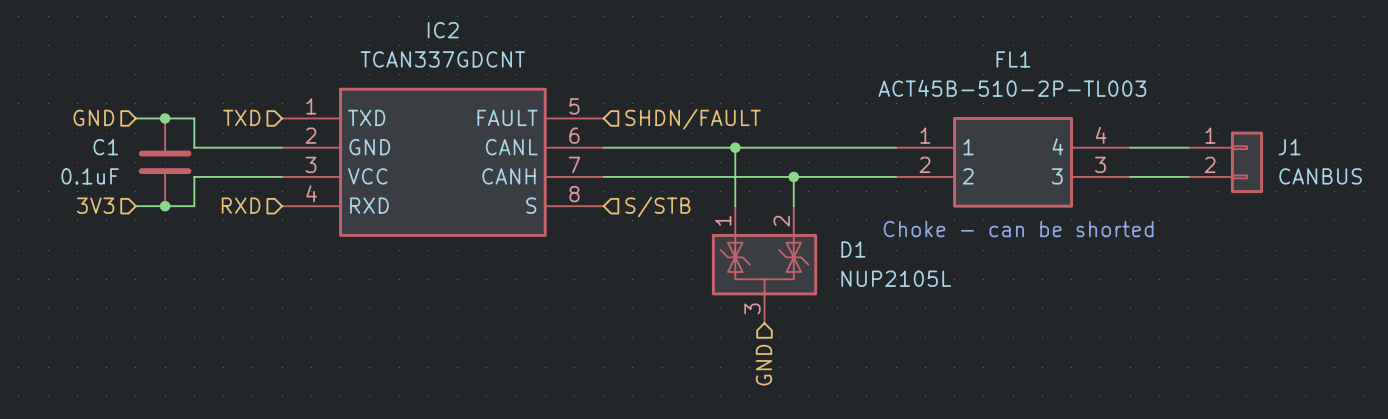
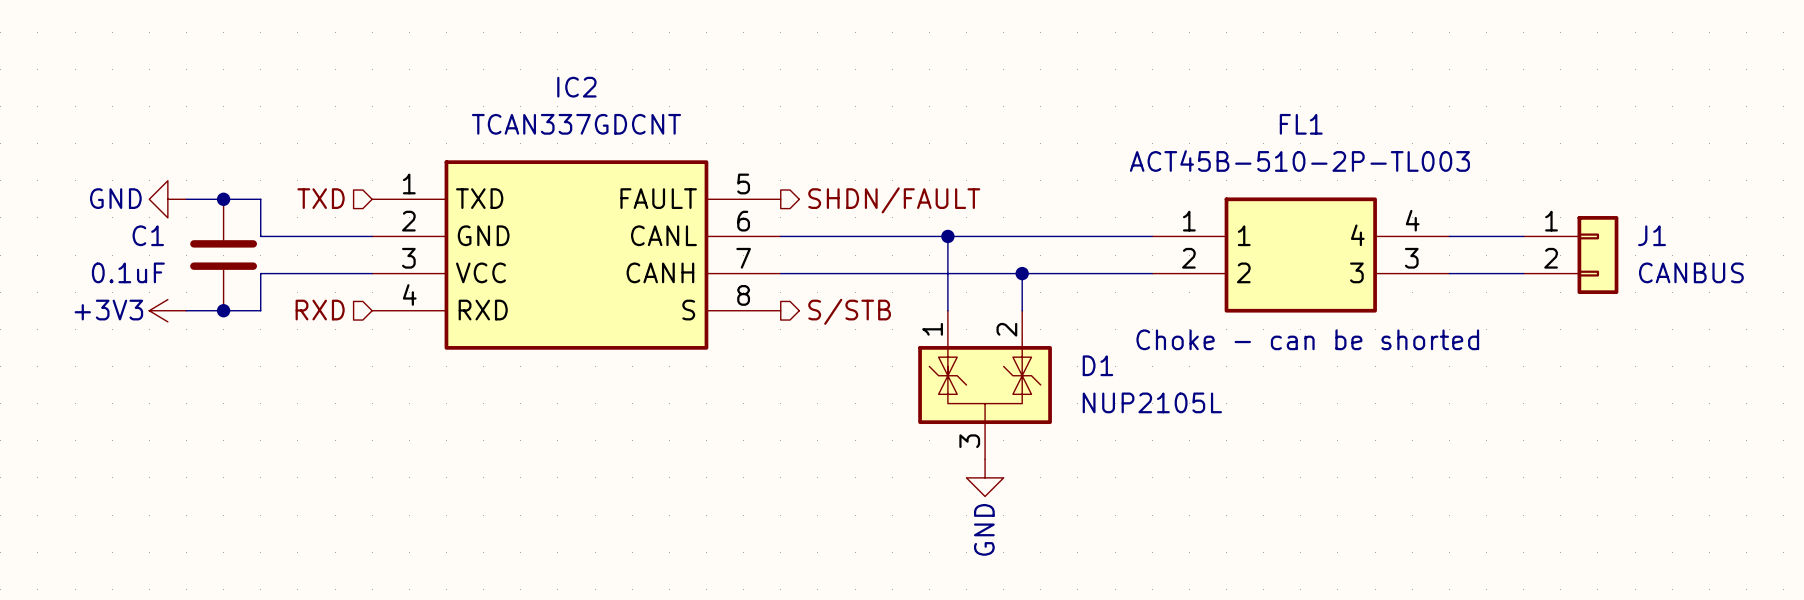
hierarchical label: GND (93, 117) -> none
power symbol: none -> GND (167, 199)
hierarchical label shape: input (693, 119) -> output (894, 200)
hierarchical label: 3V3 (95, 205) -> none
power symbol: none -> +3V3 (167, 310)
hierarchical label shape: input (657, 207) -> output (849, 311)
power symbol: none -> GND (985, 477)
hierarchical label: GND (763, 365) -> none

